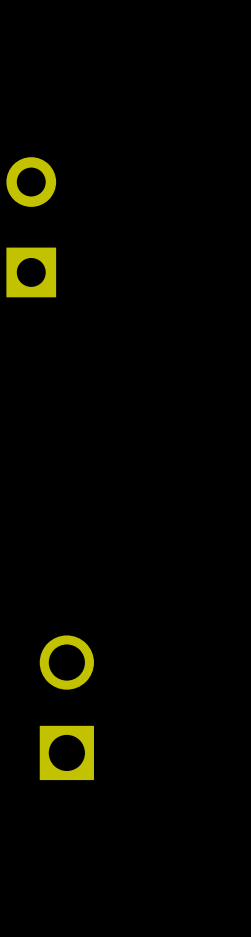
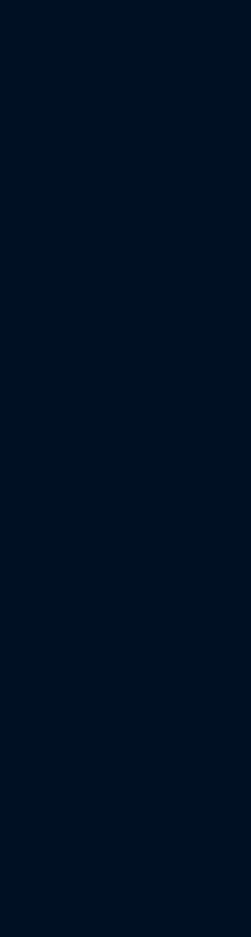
part: (31, 227) -> none
part: (66, 707) -> none

